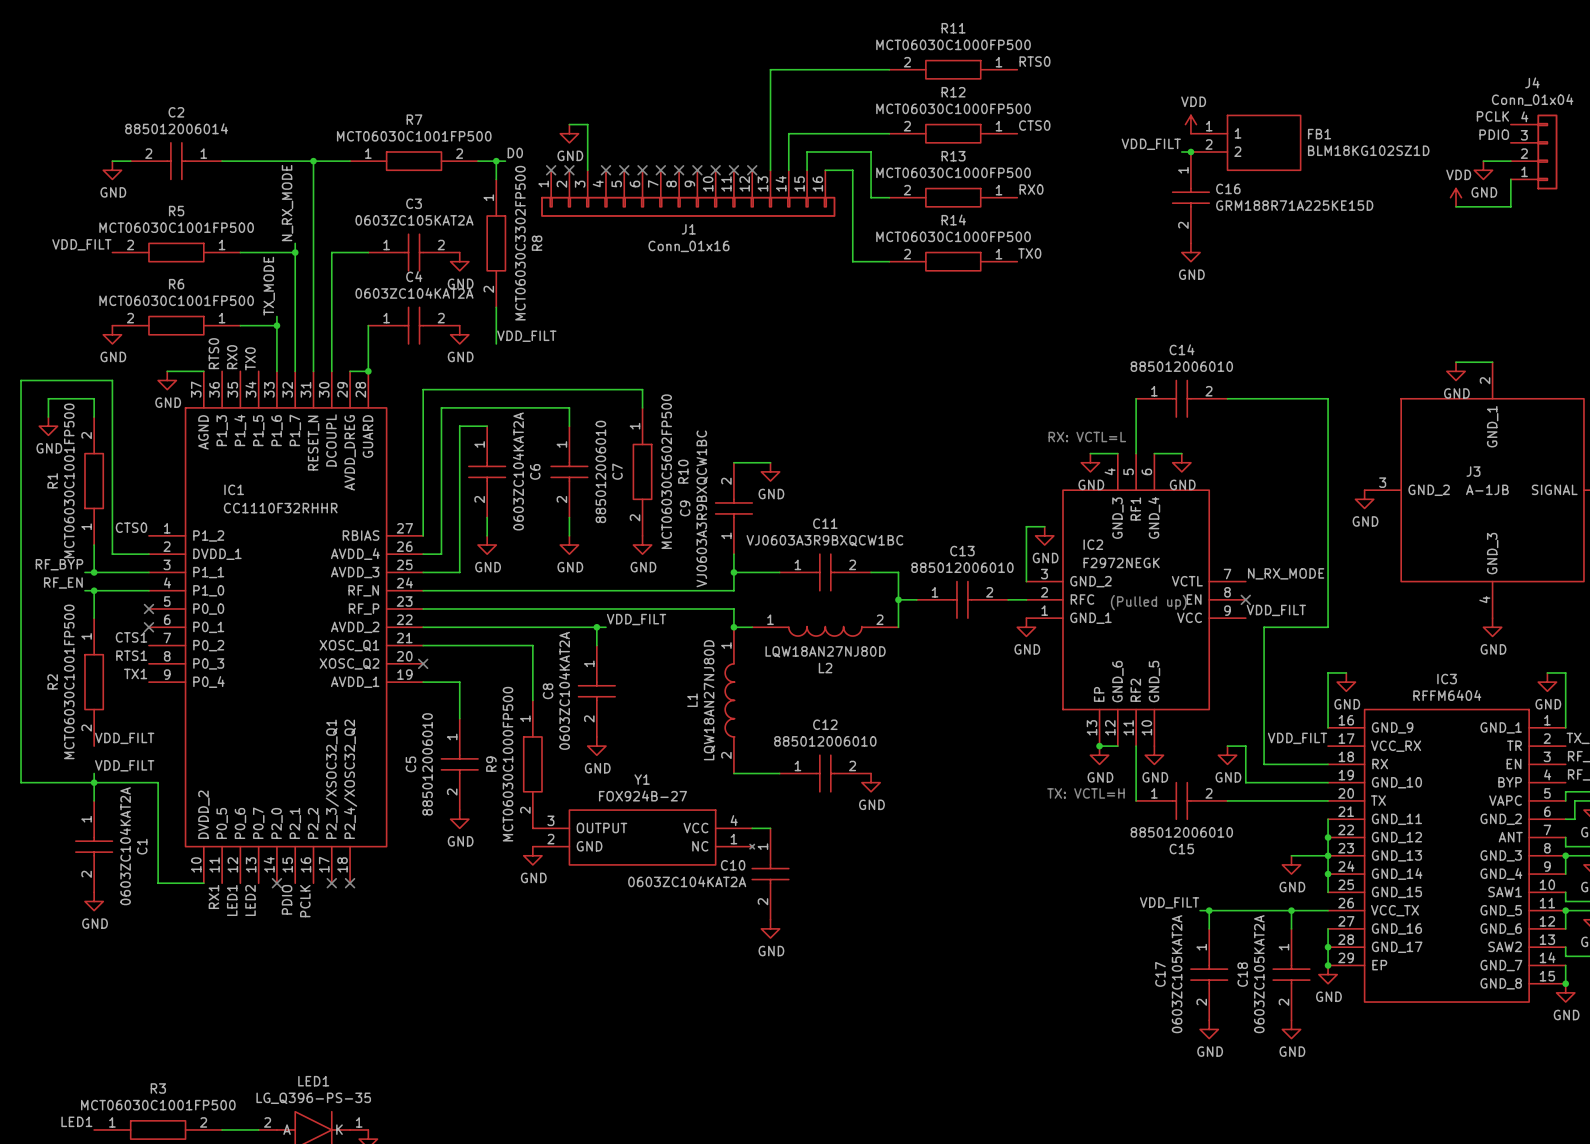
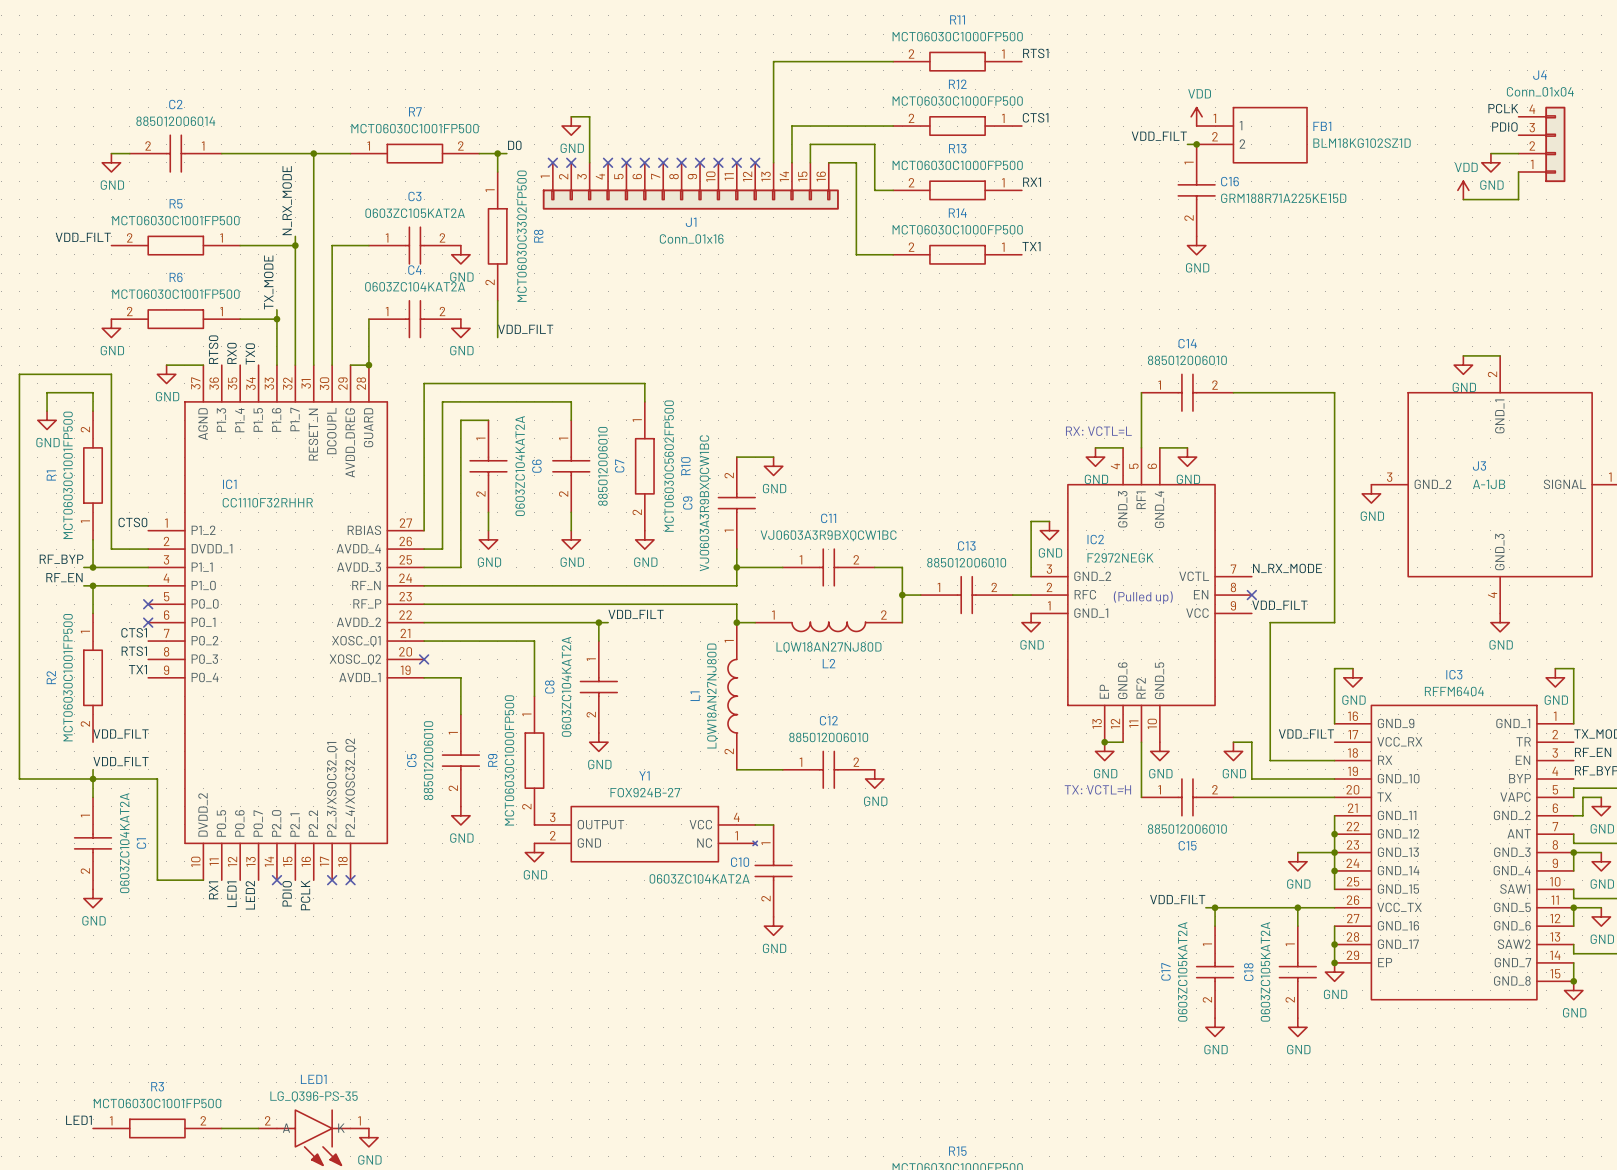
label: RTS0 (1034, 61) -> RTS1 (1035, 53)
label: CTS0 (1034, 125) -> CTS1 (1035, 117)
label: RX0 (1031, 189) -> RX1 (1032, 182)
label: TX0 (1029, 253) -> TX1 (1031, 246)

